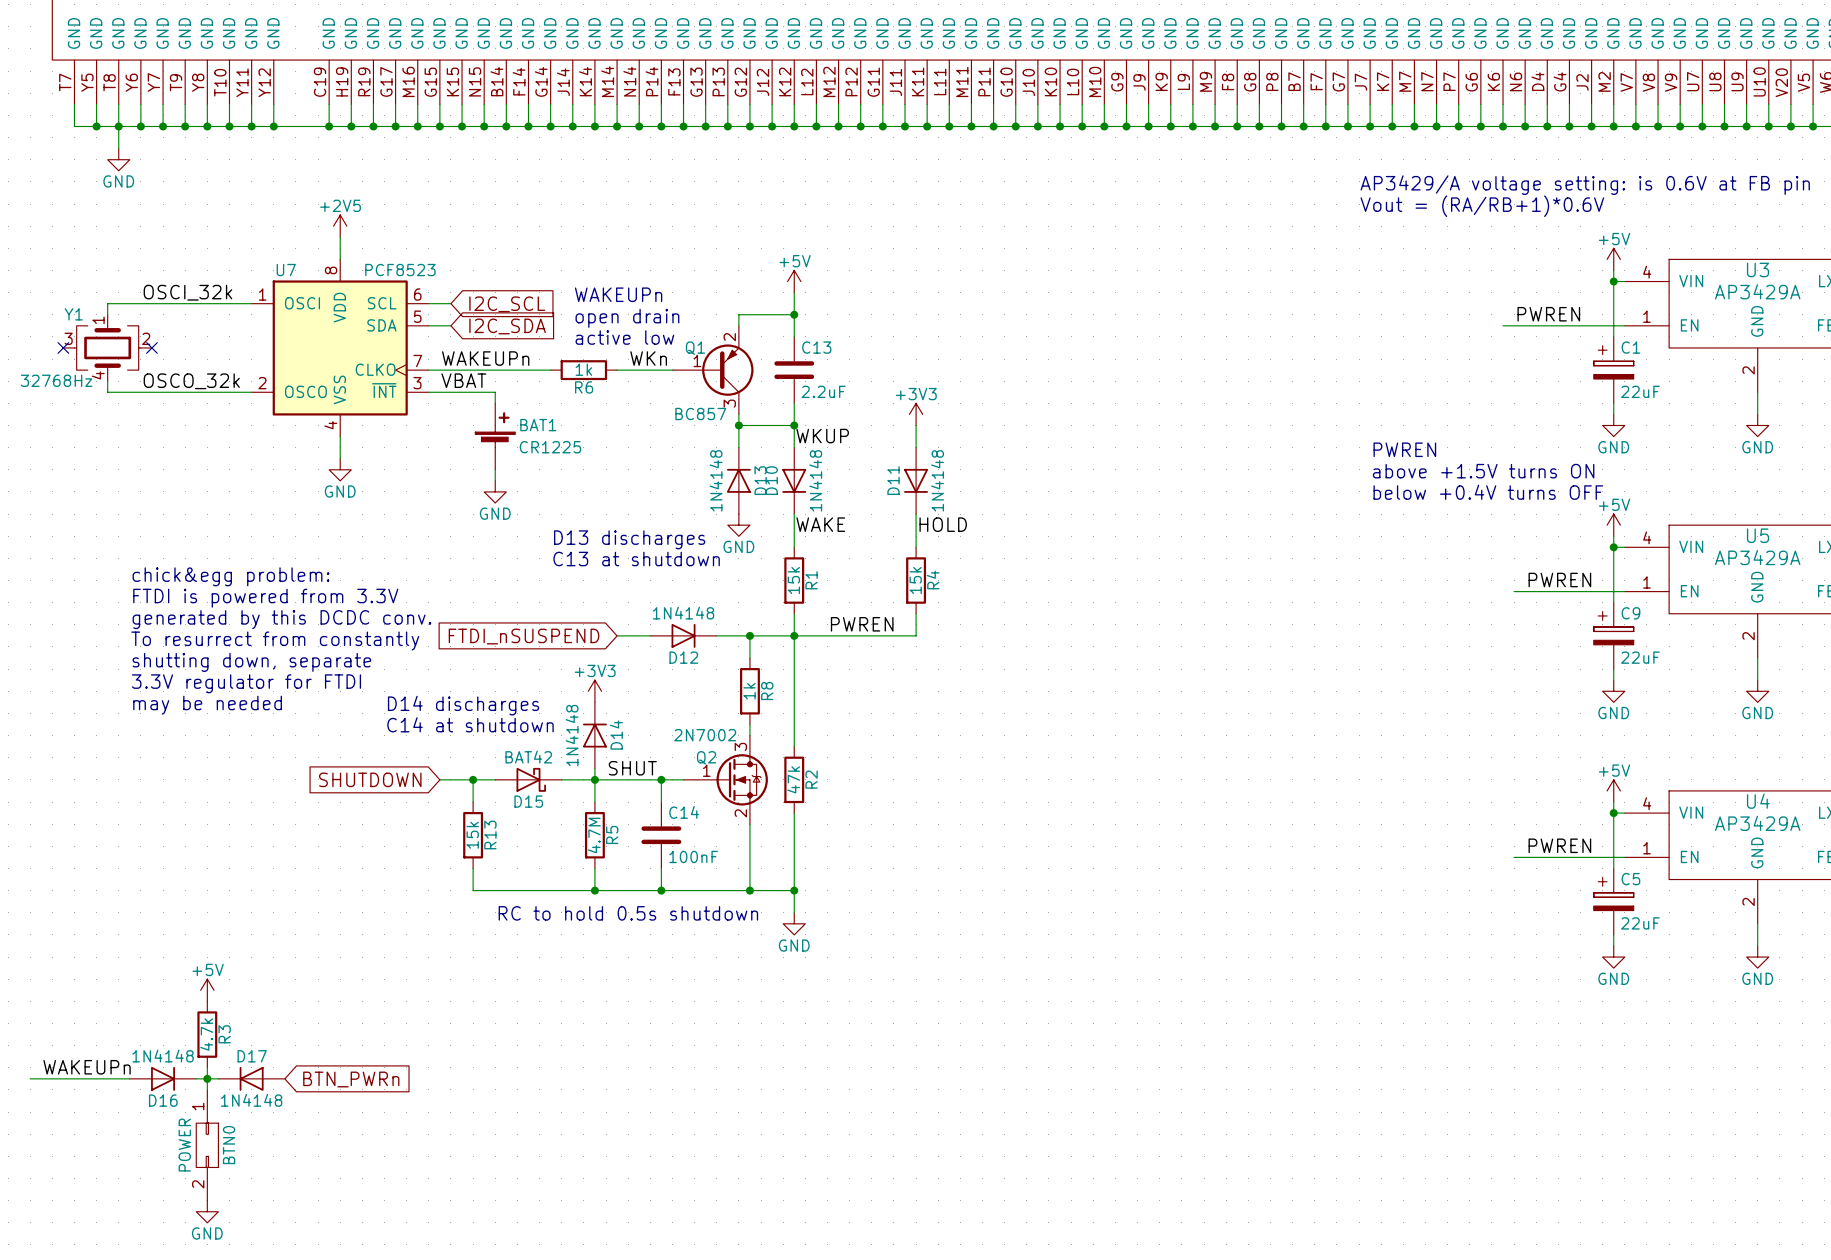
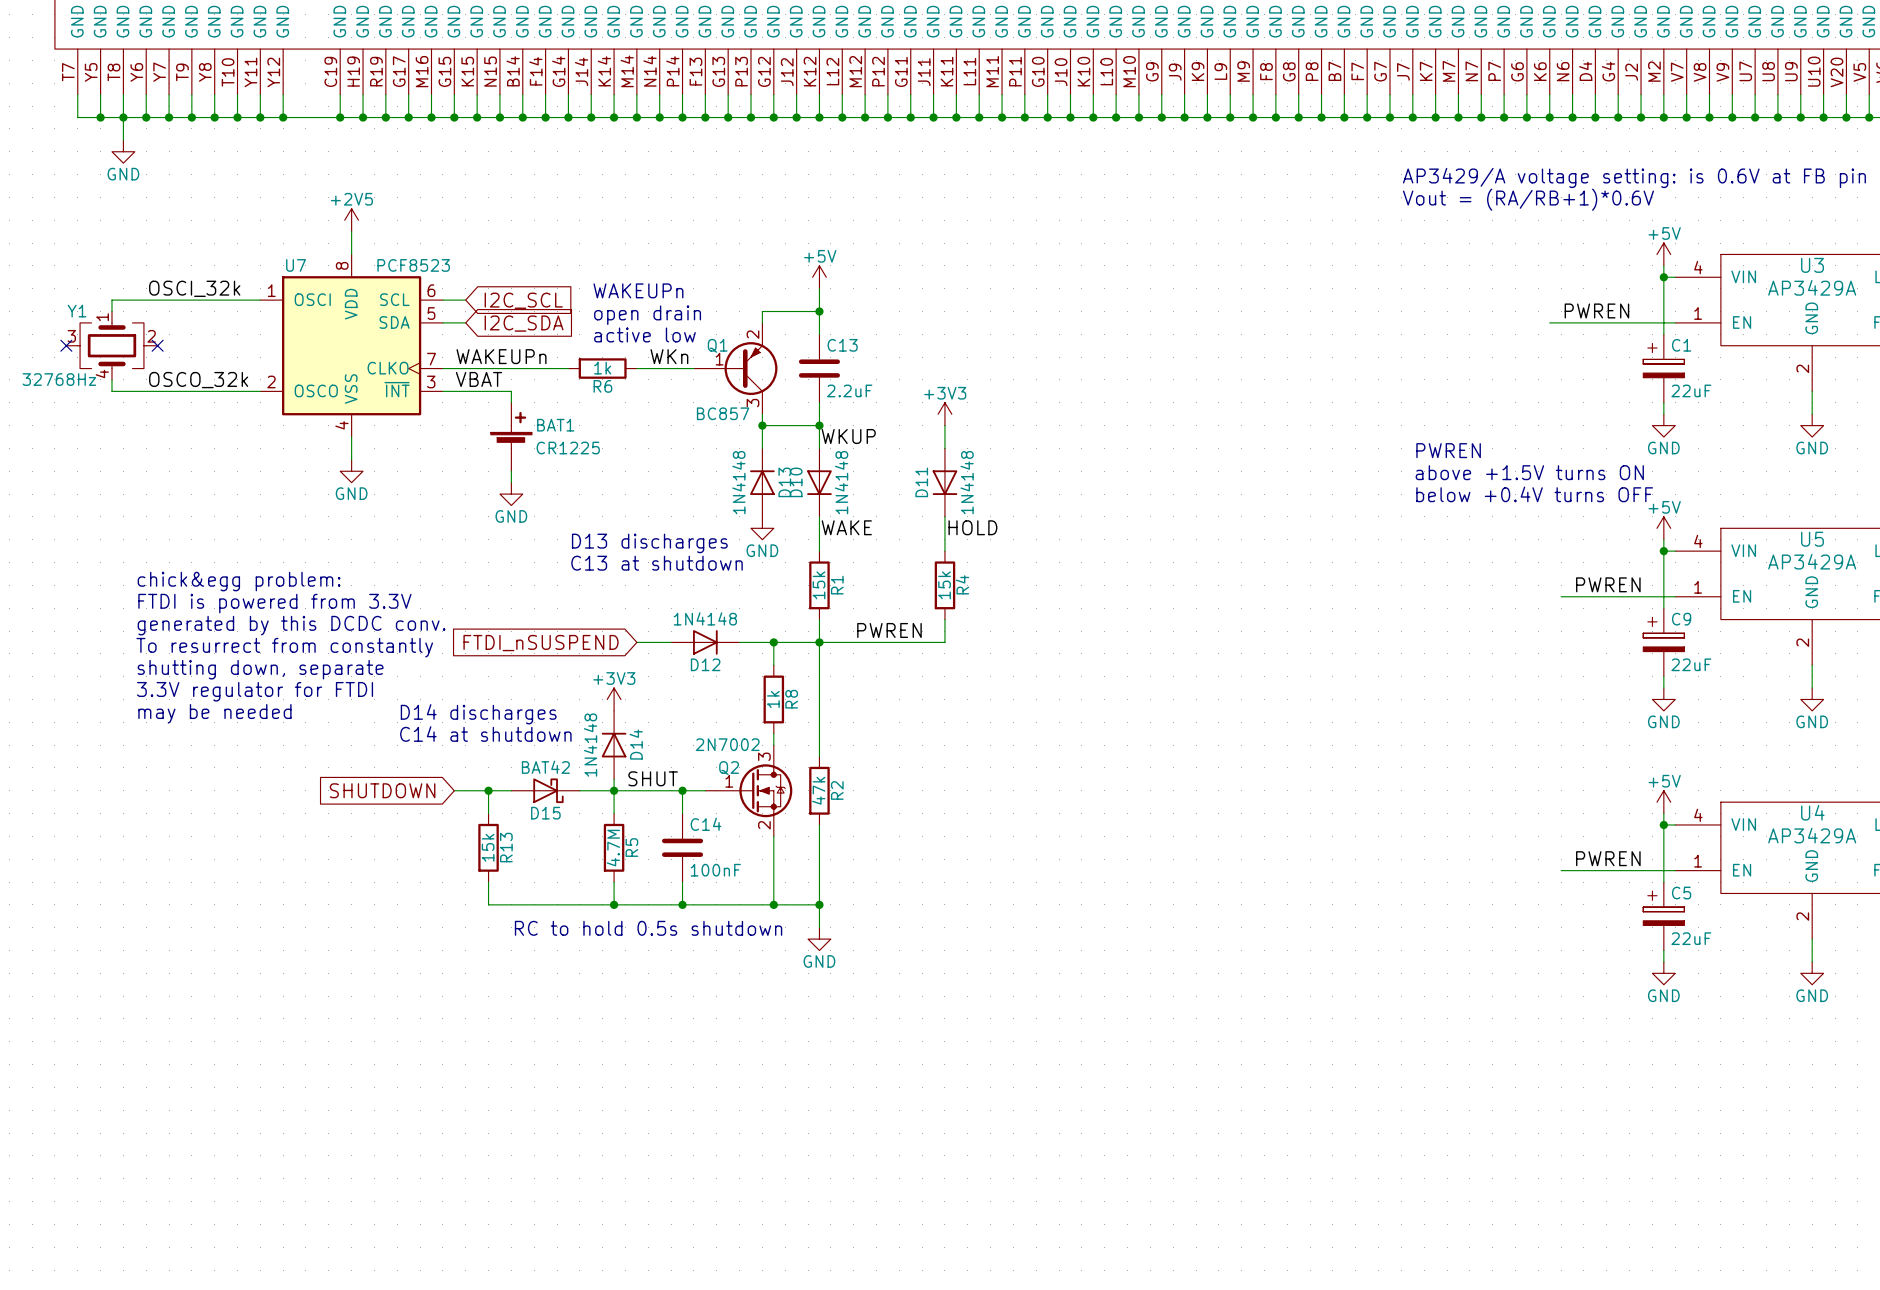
power symbol: +5V (207, 990) -> none
R3: 4.7k (207, 1034) -> none
label: WAKEUPn (87, 1067) -> none
wire: (207, 1067) (207, 1089) -> none
wire: (30, 1078) (129, 1078) -> none
D16: 1N4148 (163, 1078) -> none
wire: (196, 1078) (218, 1078) -> none
junction: (207, 1078) -> none
D17: 1N4148 (251, 1078) -> none
global label: BTN_PWRn (351, 1079) -> none
BTN0: POWER (207, 1145) -> none
power symbol: GND (207, 1211) -> none

